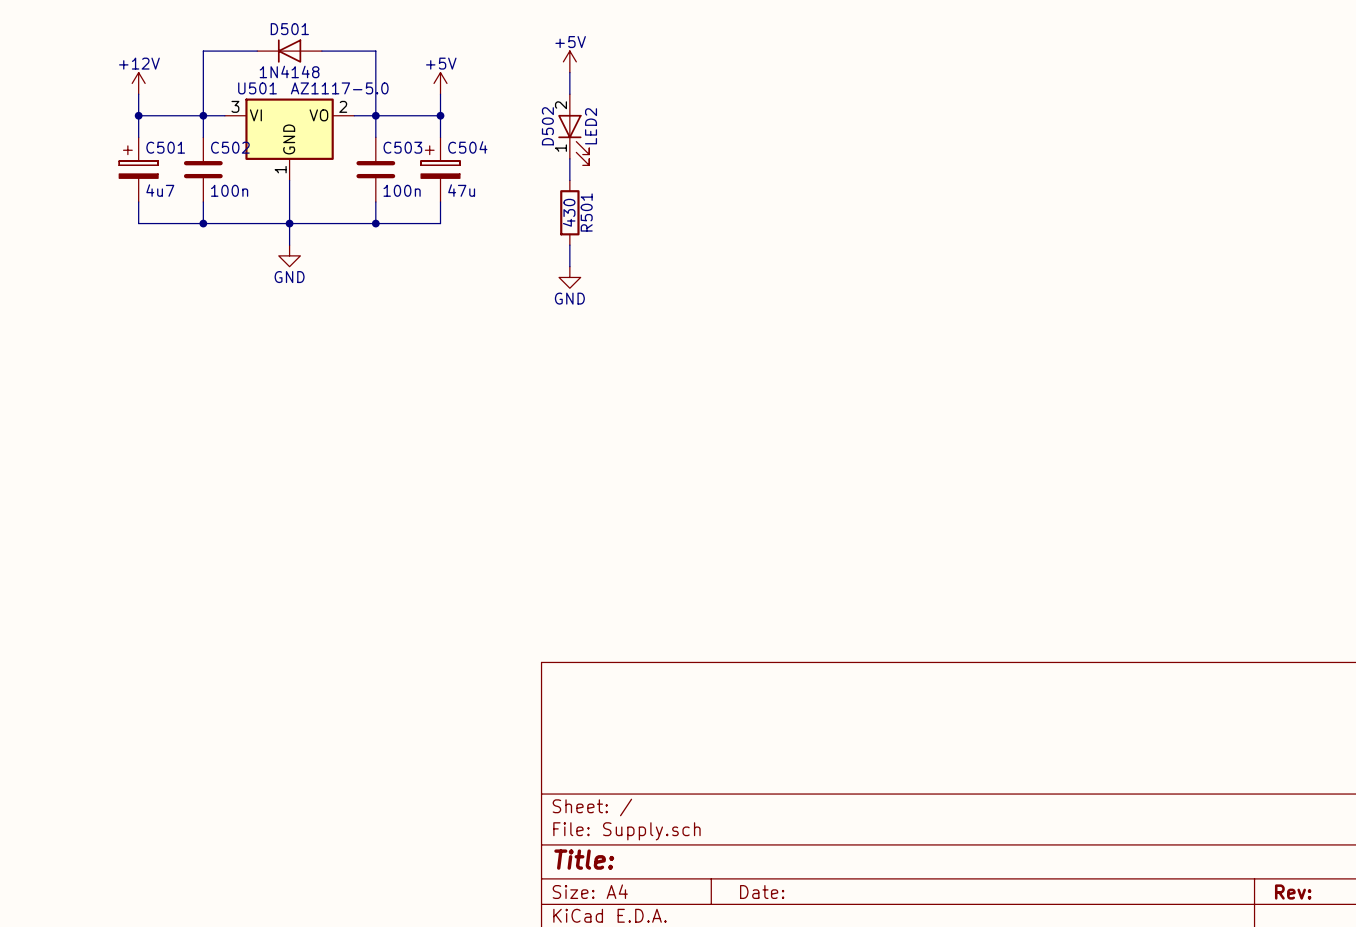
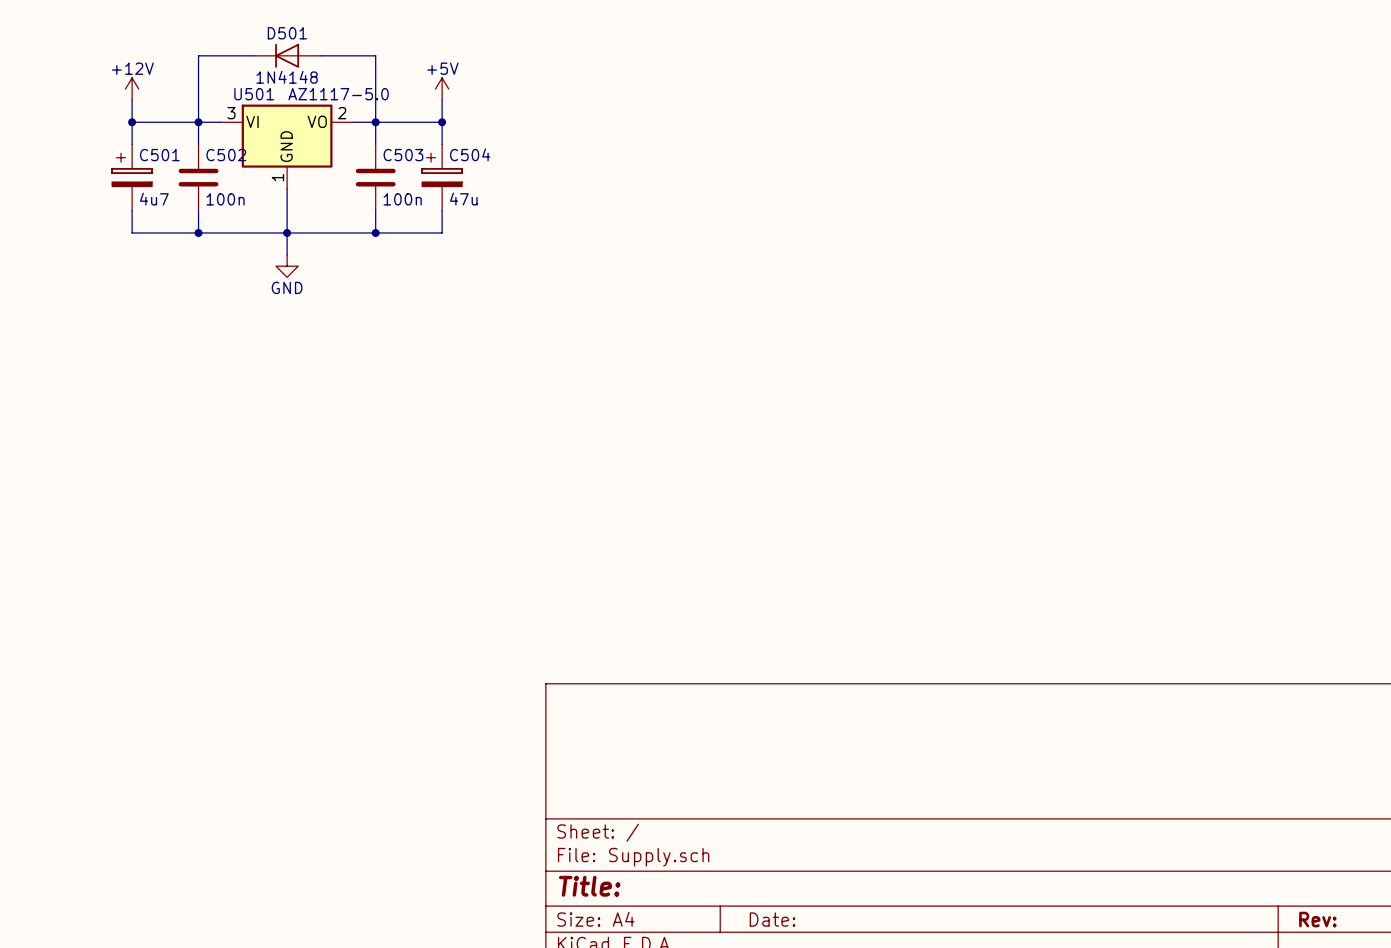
power symbol: +5V (569, 61) -> none
wire: (569, 72) (569, 94) -> none
D502: LED2 (573, 129) -> none
wire: (569, 158) (569, 180) -> none
R501: 430 (569, 212) -> none
wire: (569, 245) (569, 266) -> none
power symbol: GND (569, 277) -> none

